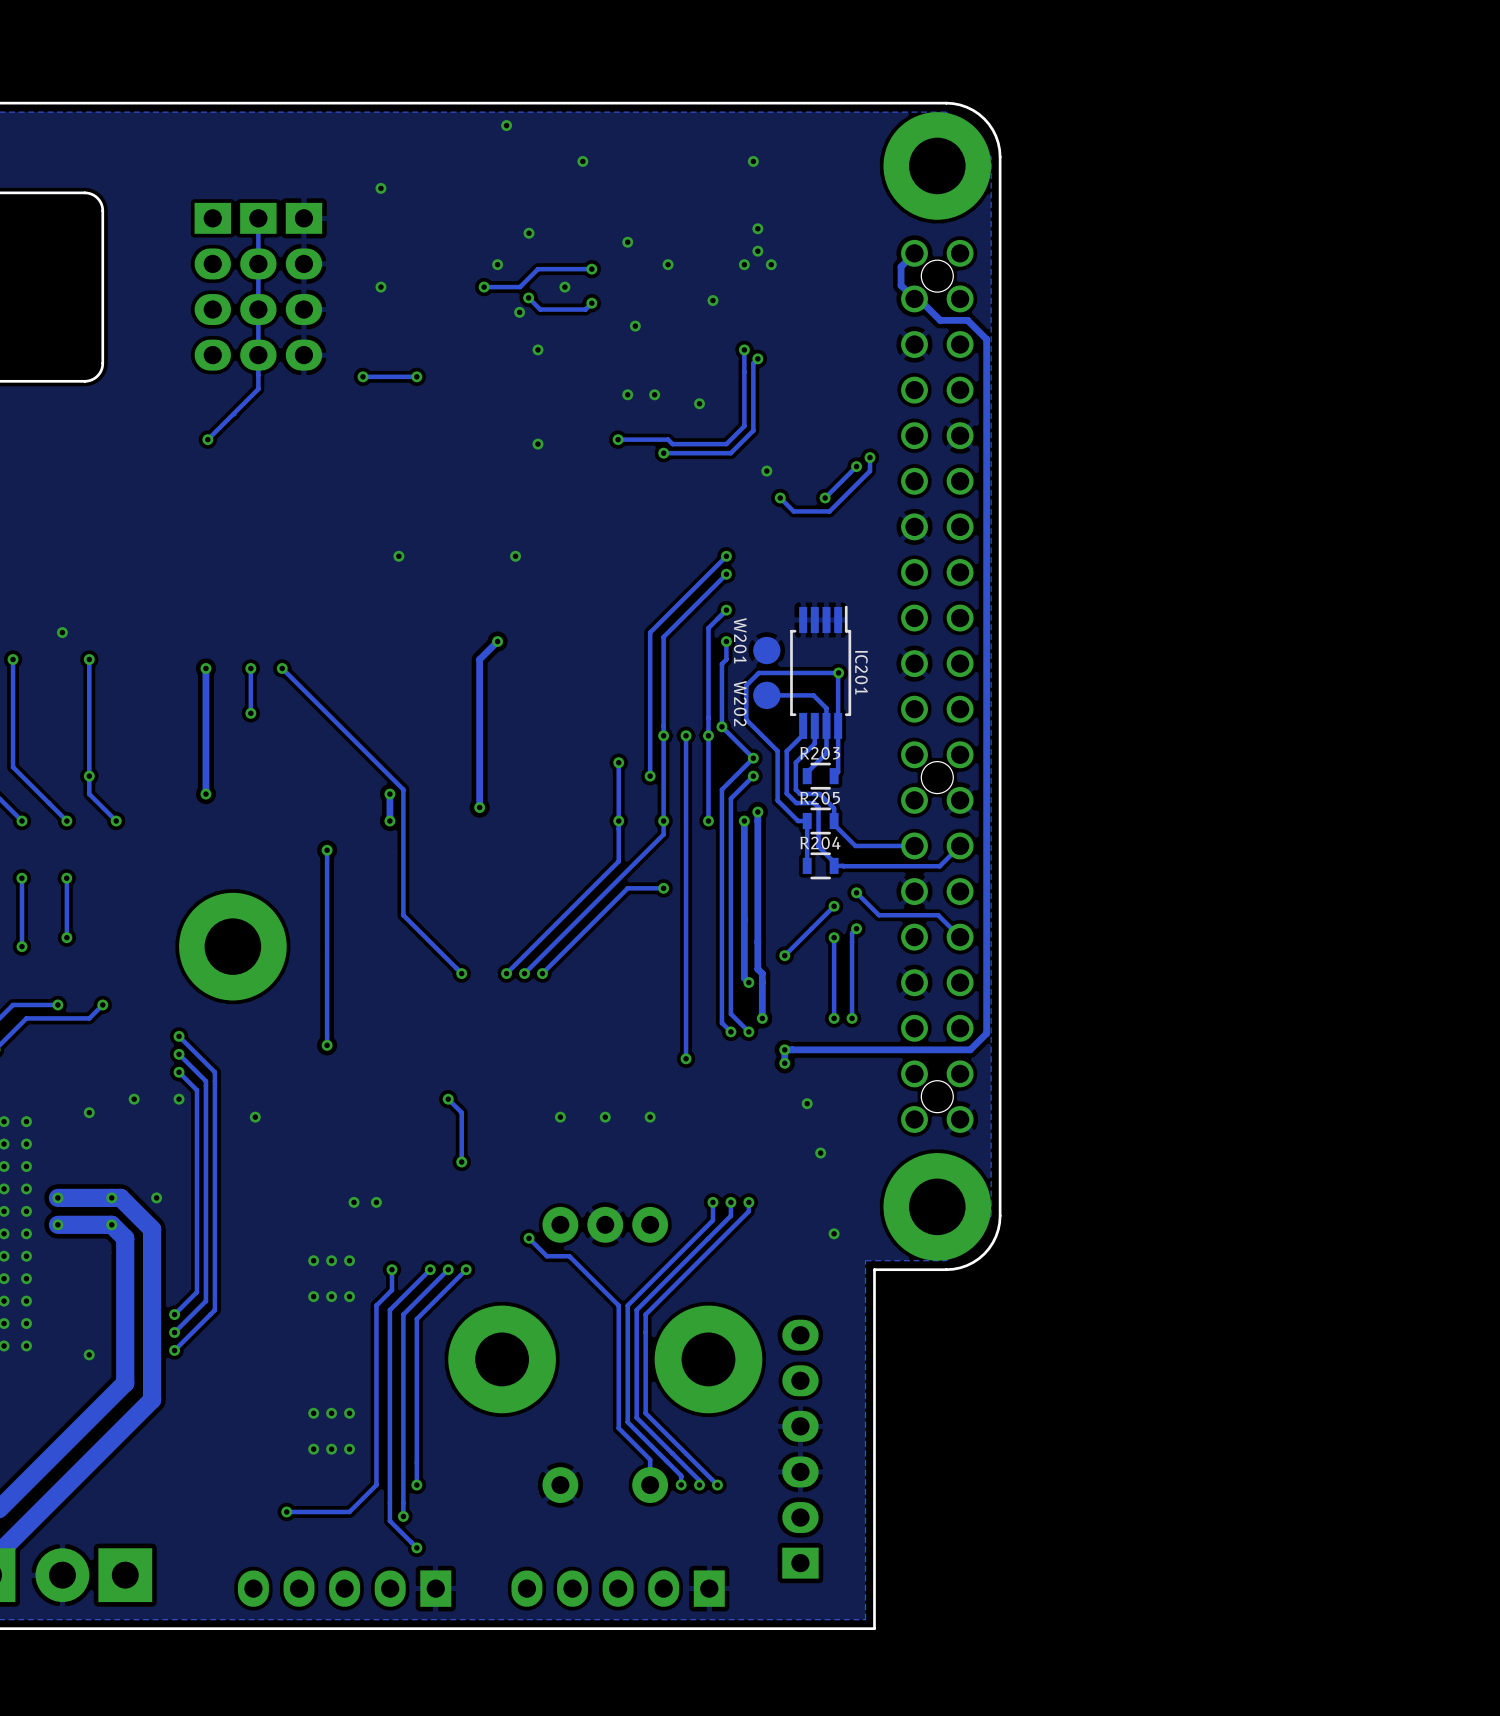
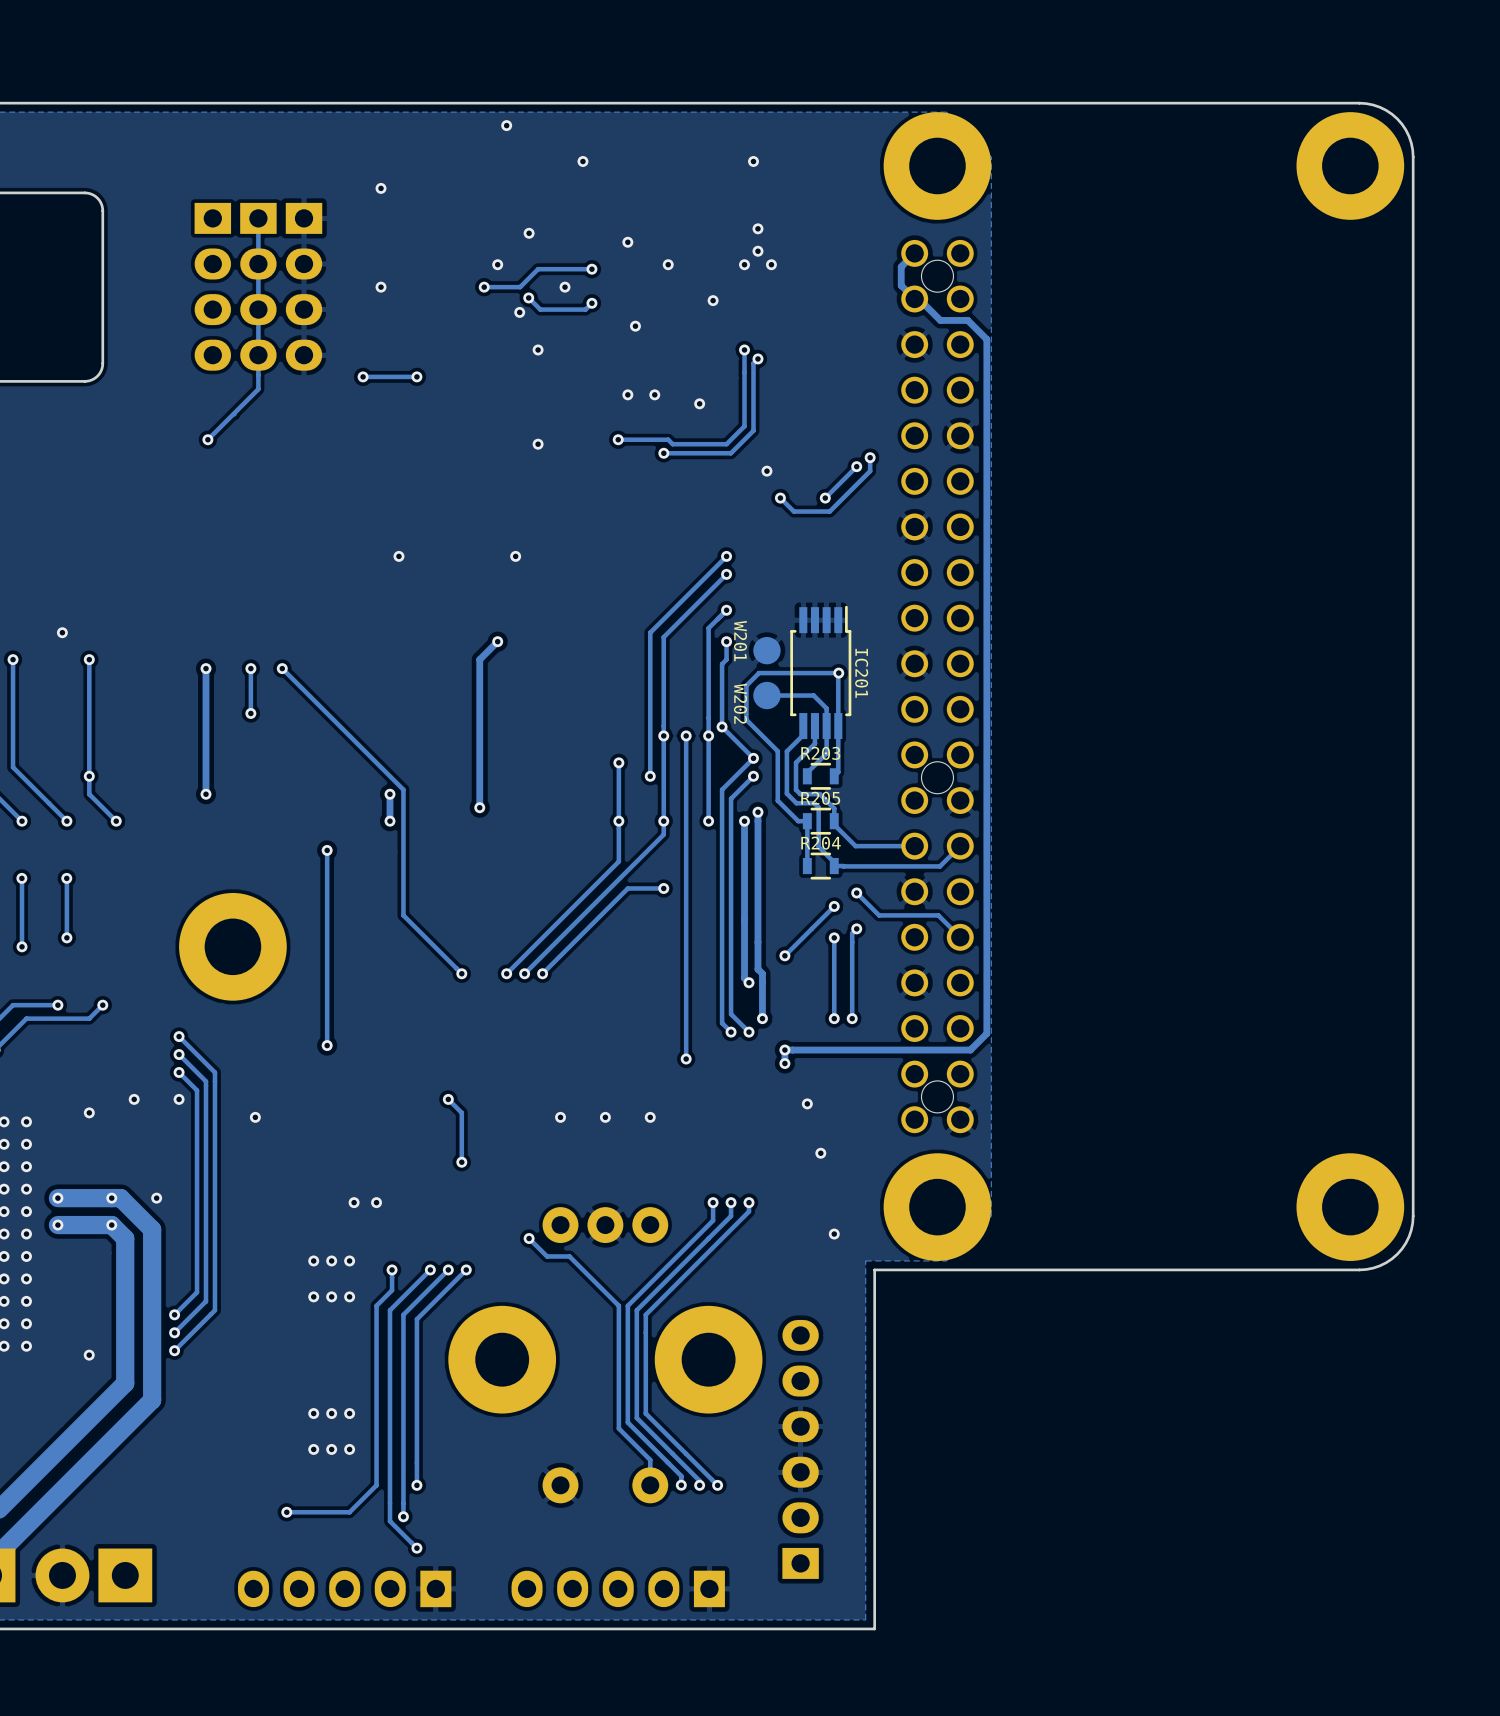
board edge: (946, 103) (966, 107) (984, 118) (996, 136) (1000, 156) (1000, 1215) (996, 1236) (984, 1253) (966, 1265) (946, 1269) -> (946, 103) (1366, 103) (1386, 110) (1397, 118) (1409, 136) (1413, 157) (1413, 1216) (1409, 1236) (1402, 1248) (1392, 1258) (1379, 1265) (1366, 1269) (946, 1269)
part: none -> (1350, 165)
part: none -> (1350, 1207)

